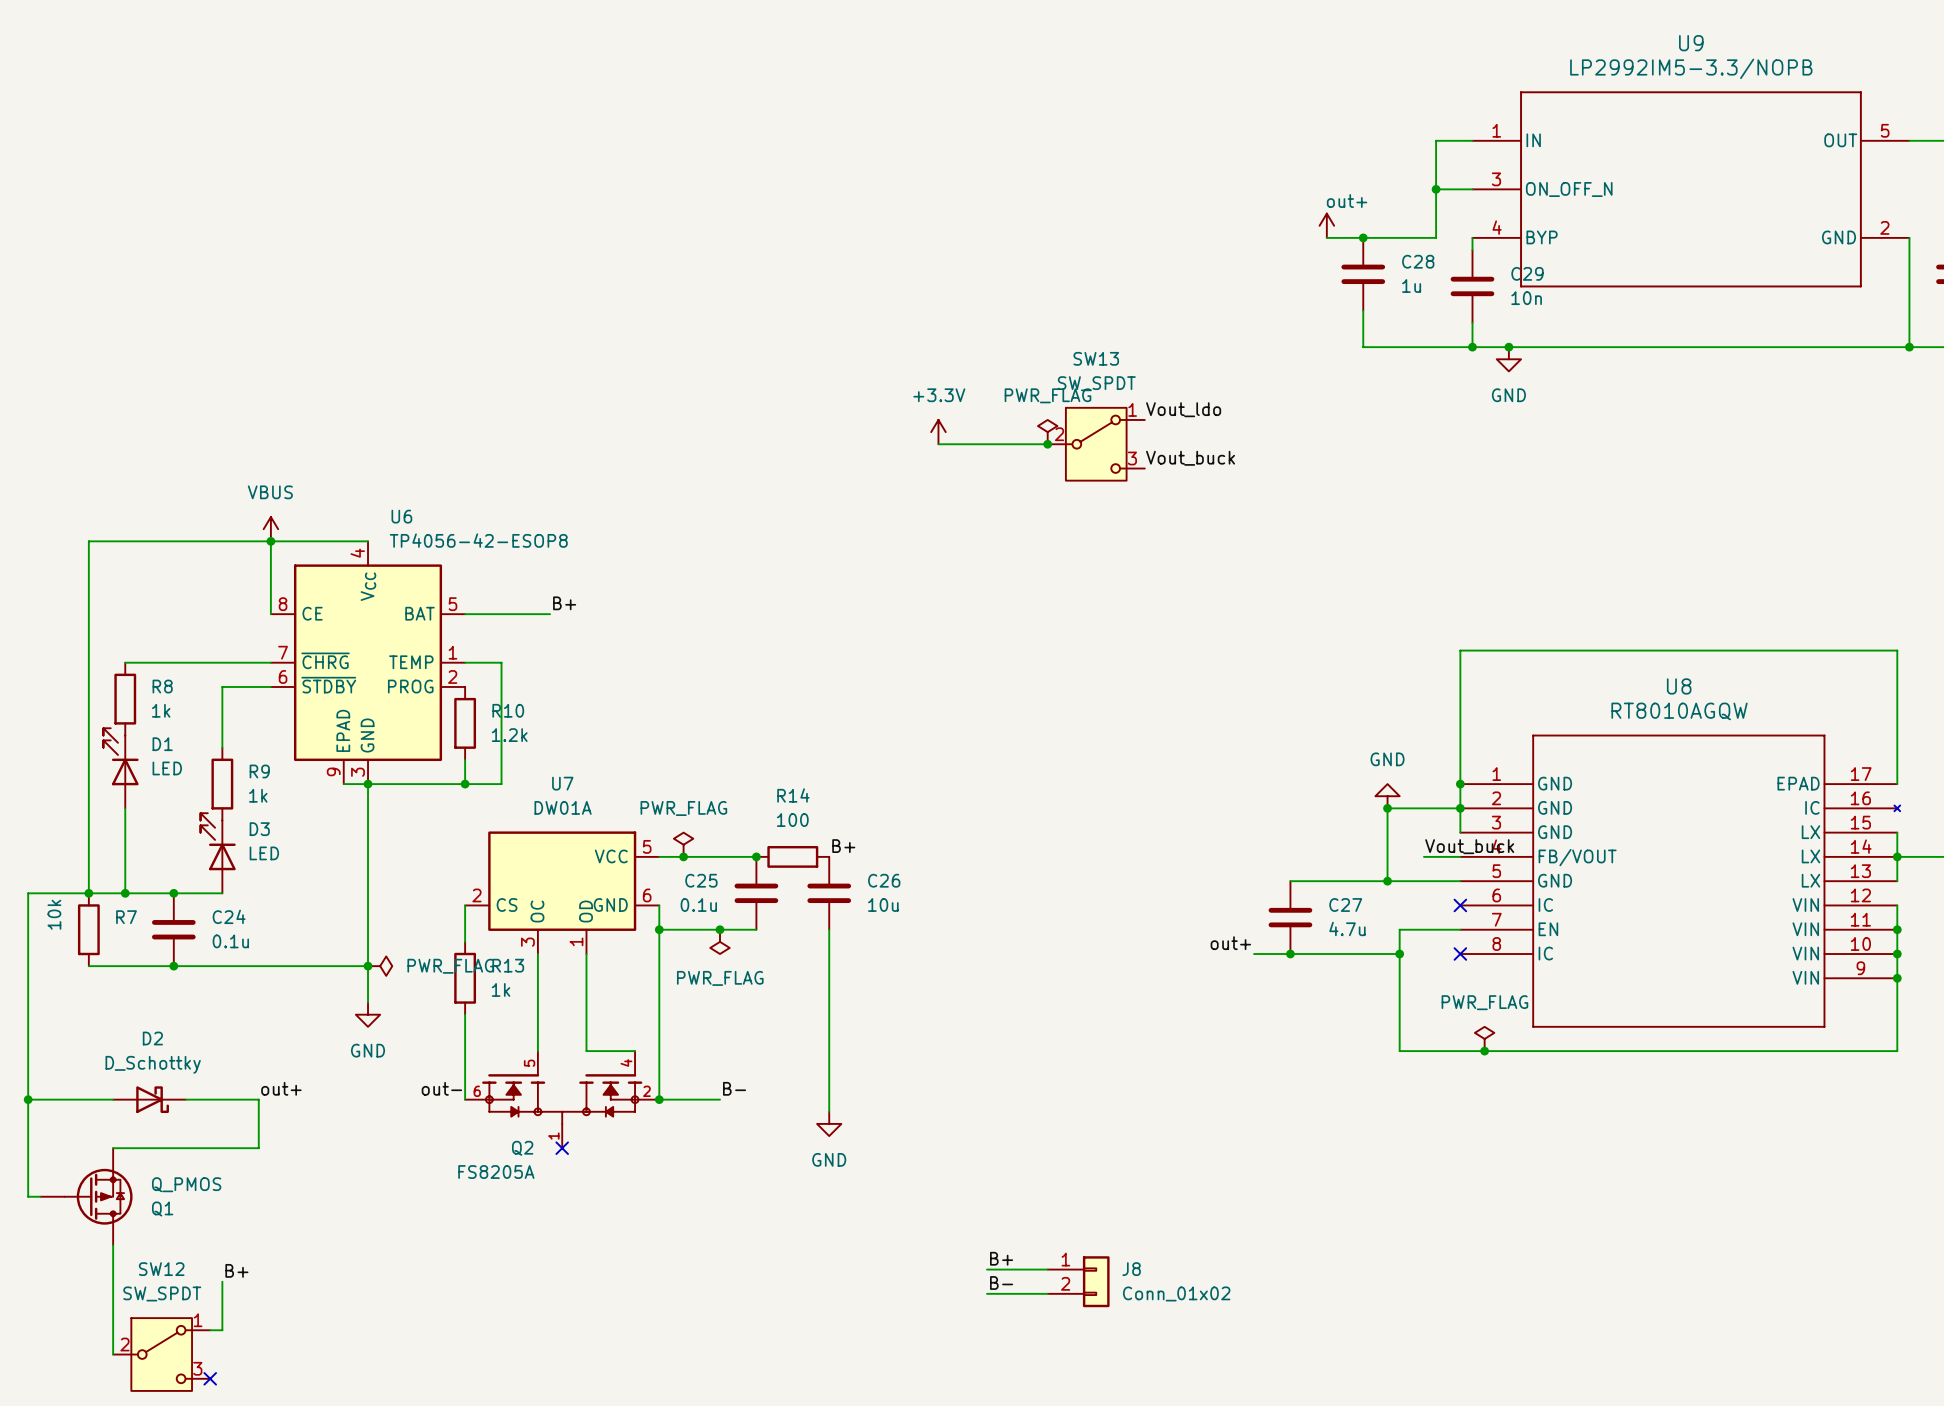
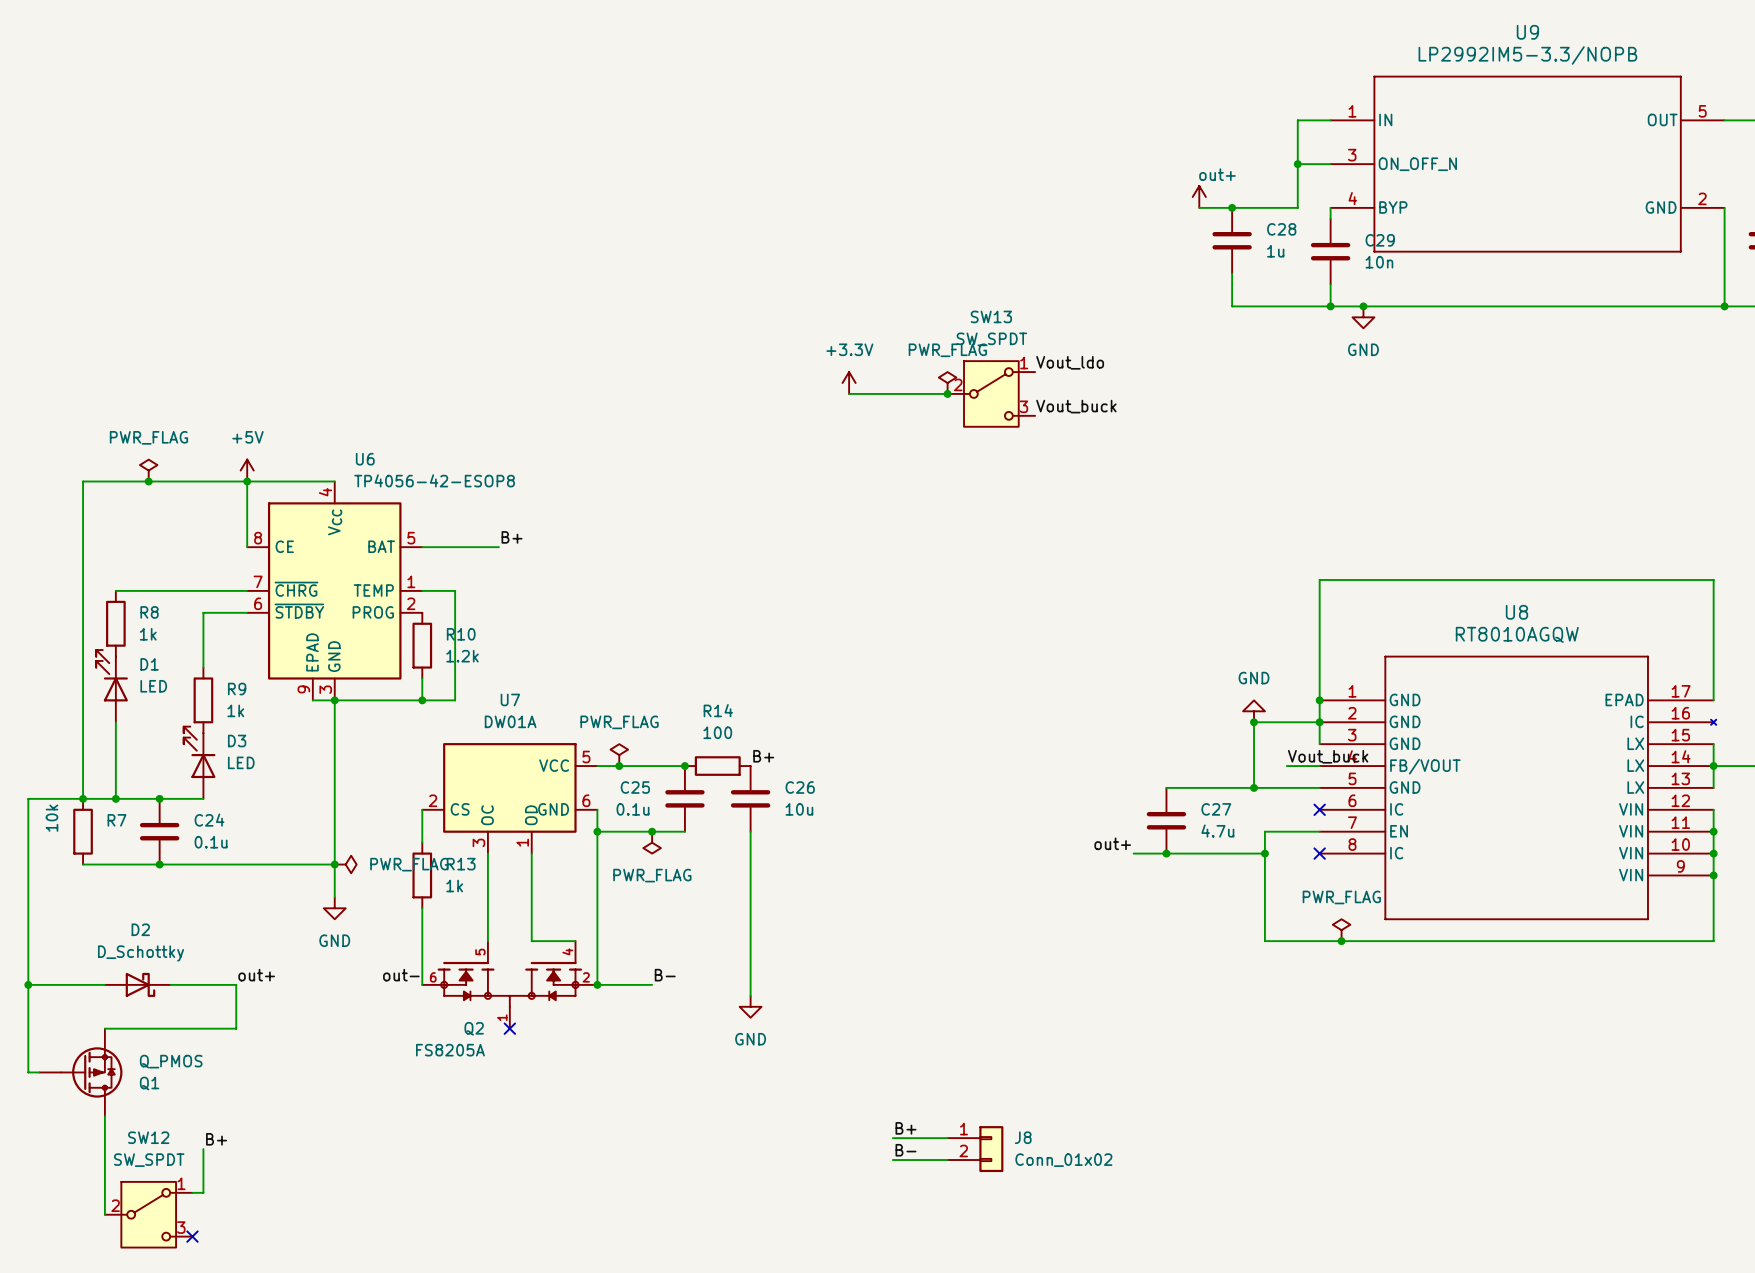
power symbol: none -> PWR_FLAG (148, 470)
power symbol: VBUS (270, 529) -> +5V (247, 470)
junction: none -> (148, 481)

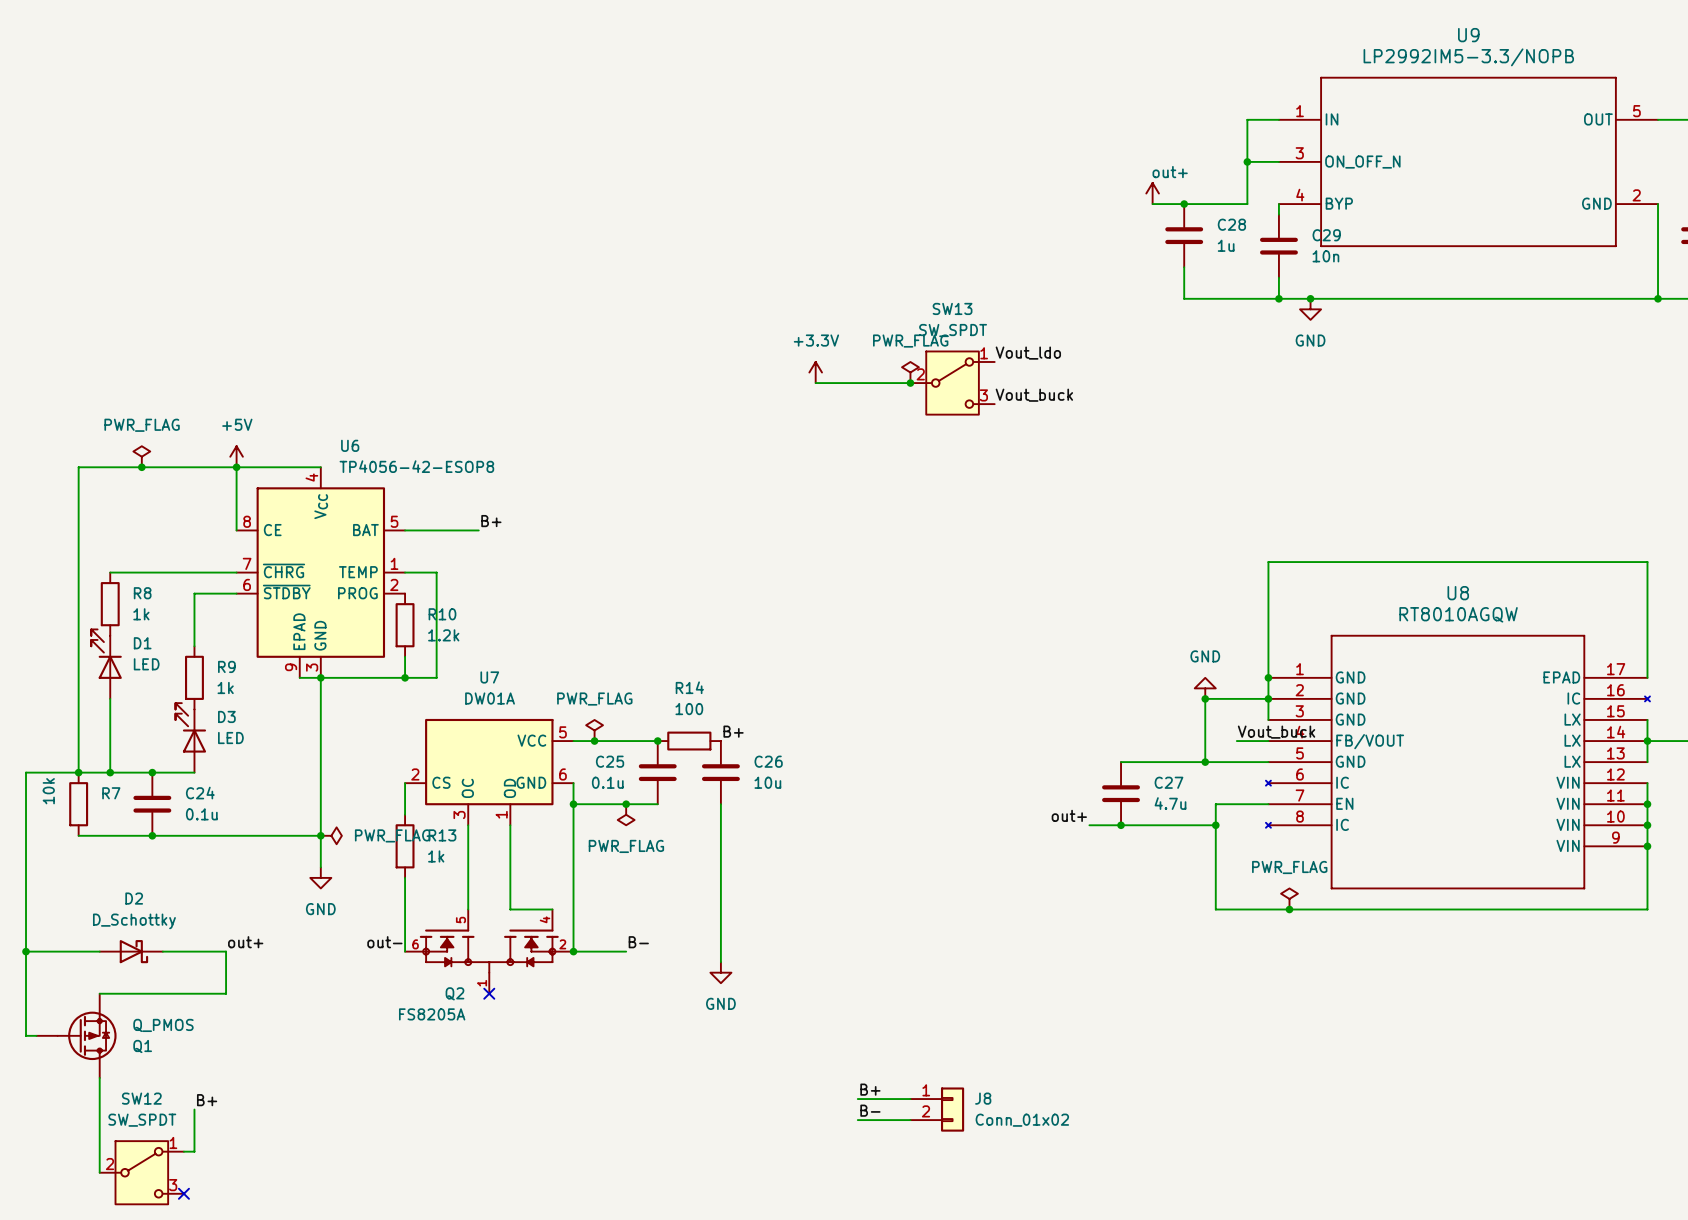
U8 symbol: [1319, 656, 1717, 920] -> [1265, 635, 1650, 889]
no-connect mark: (1319, 809) -> none
no-connect mark: (1319, 853) -> none

